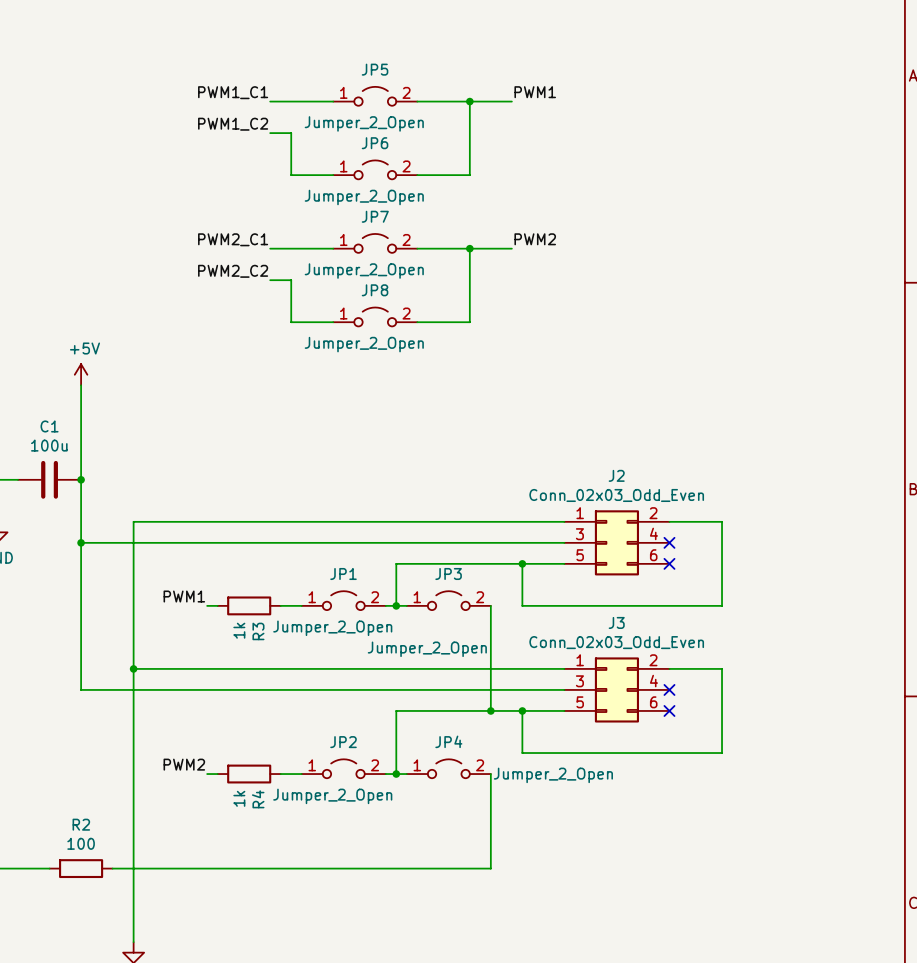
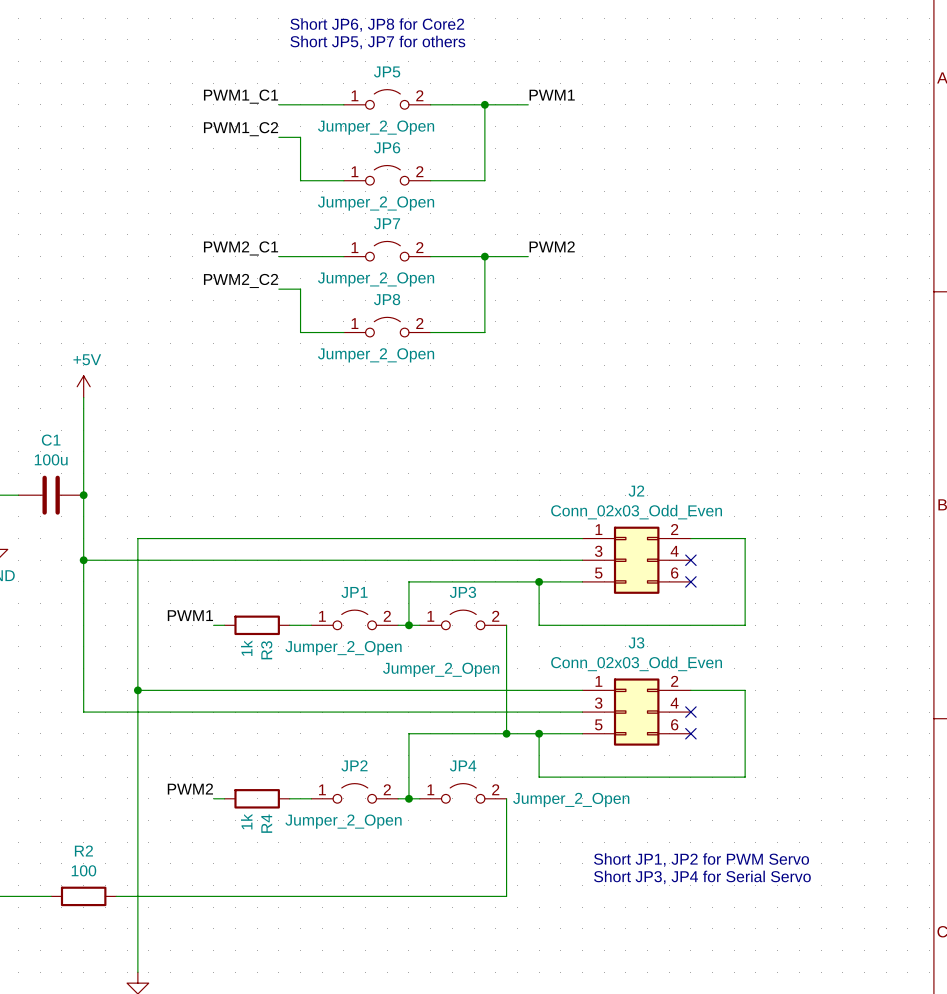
text: none -> Short JP6, JP8 for Core2 (377, 24)
text: none -> Short JP5, JP7 for others (377, 42)
text: none -> Short JP1, JP2 for PWM Servo (701, 859)
text: none -> Short JP3, JP4 for Serial Servo (702, 877)

